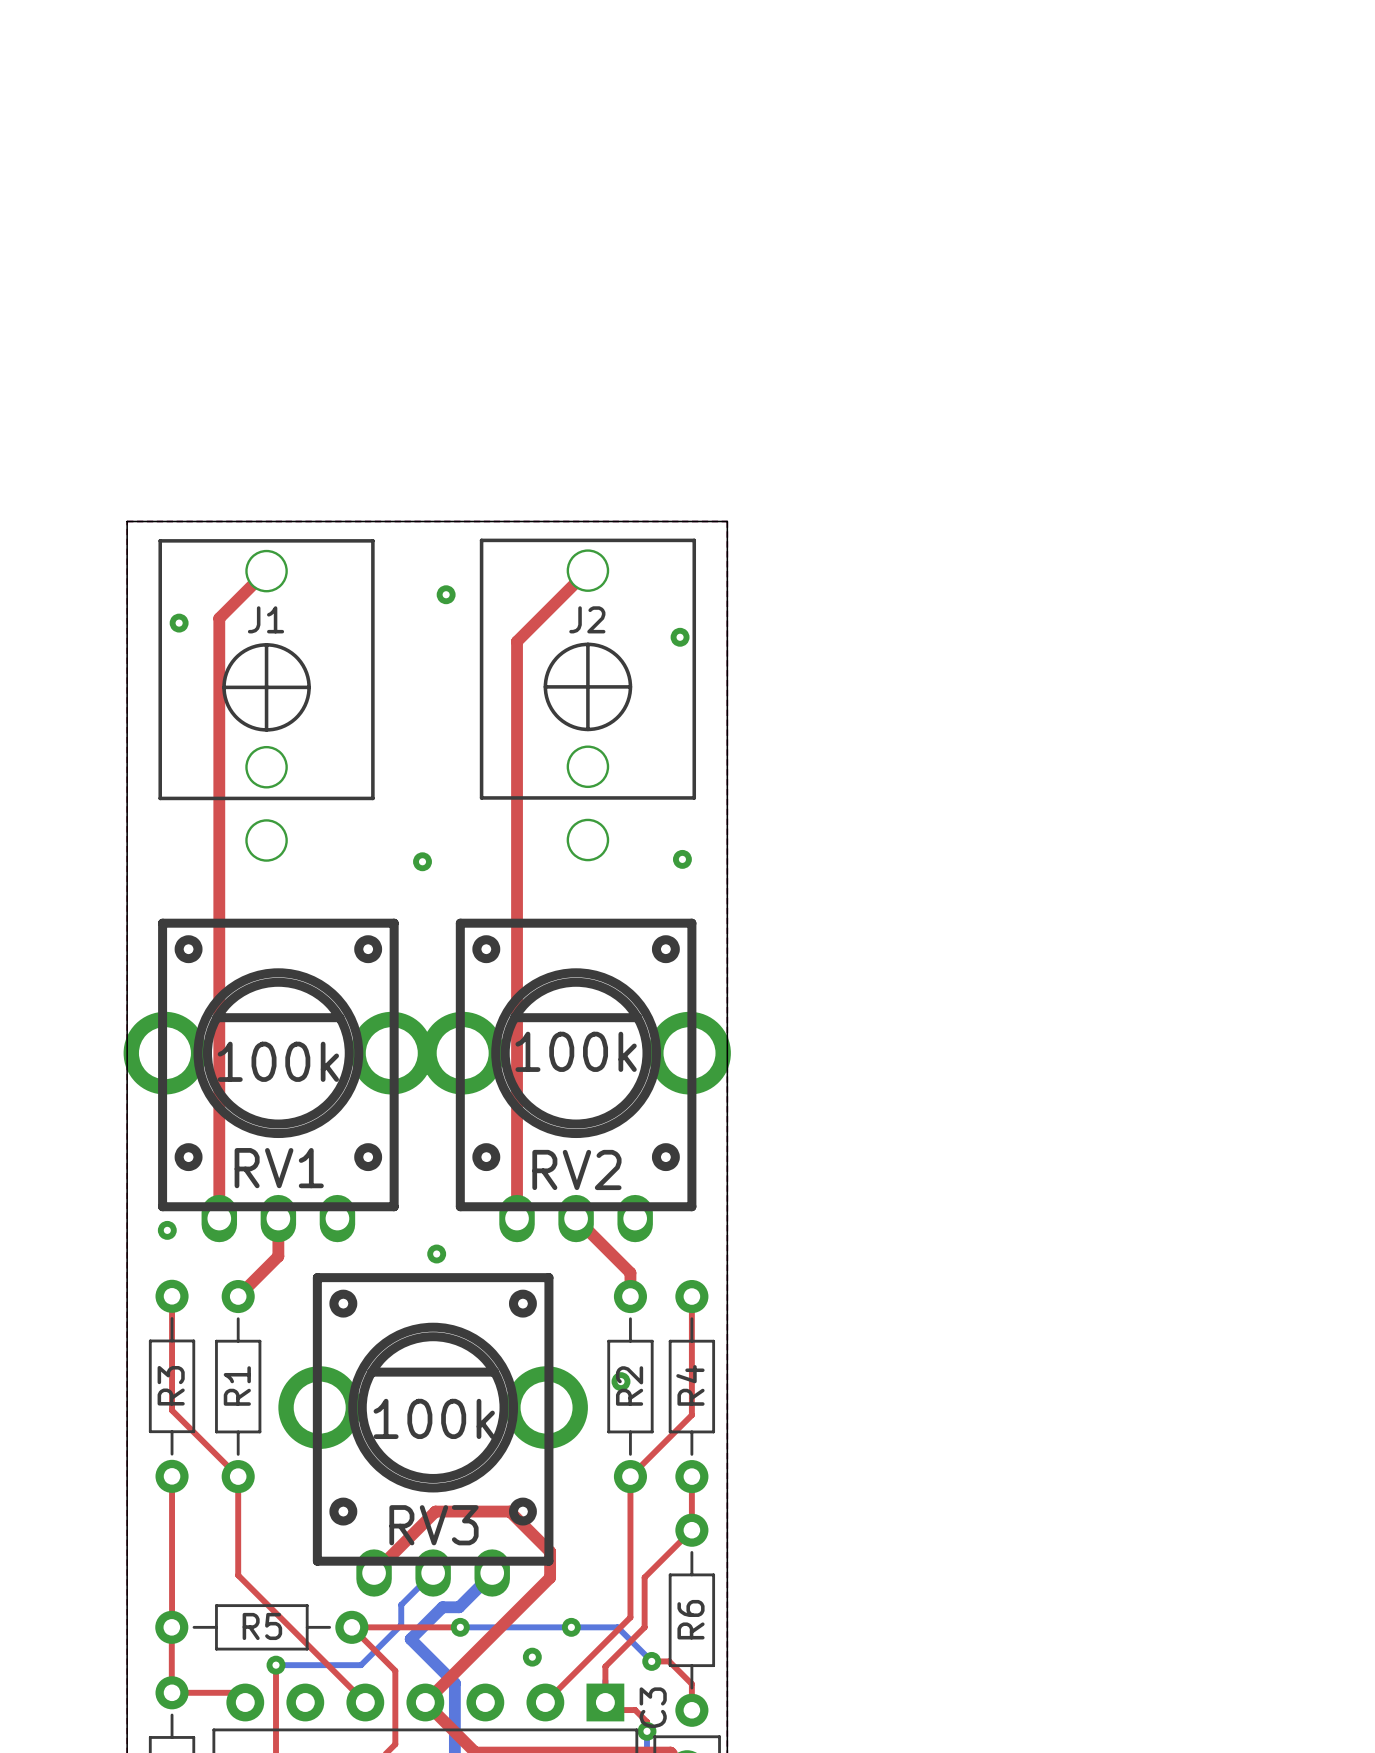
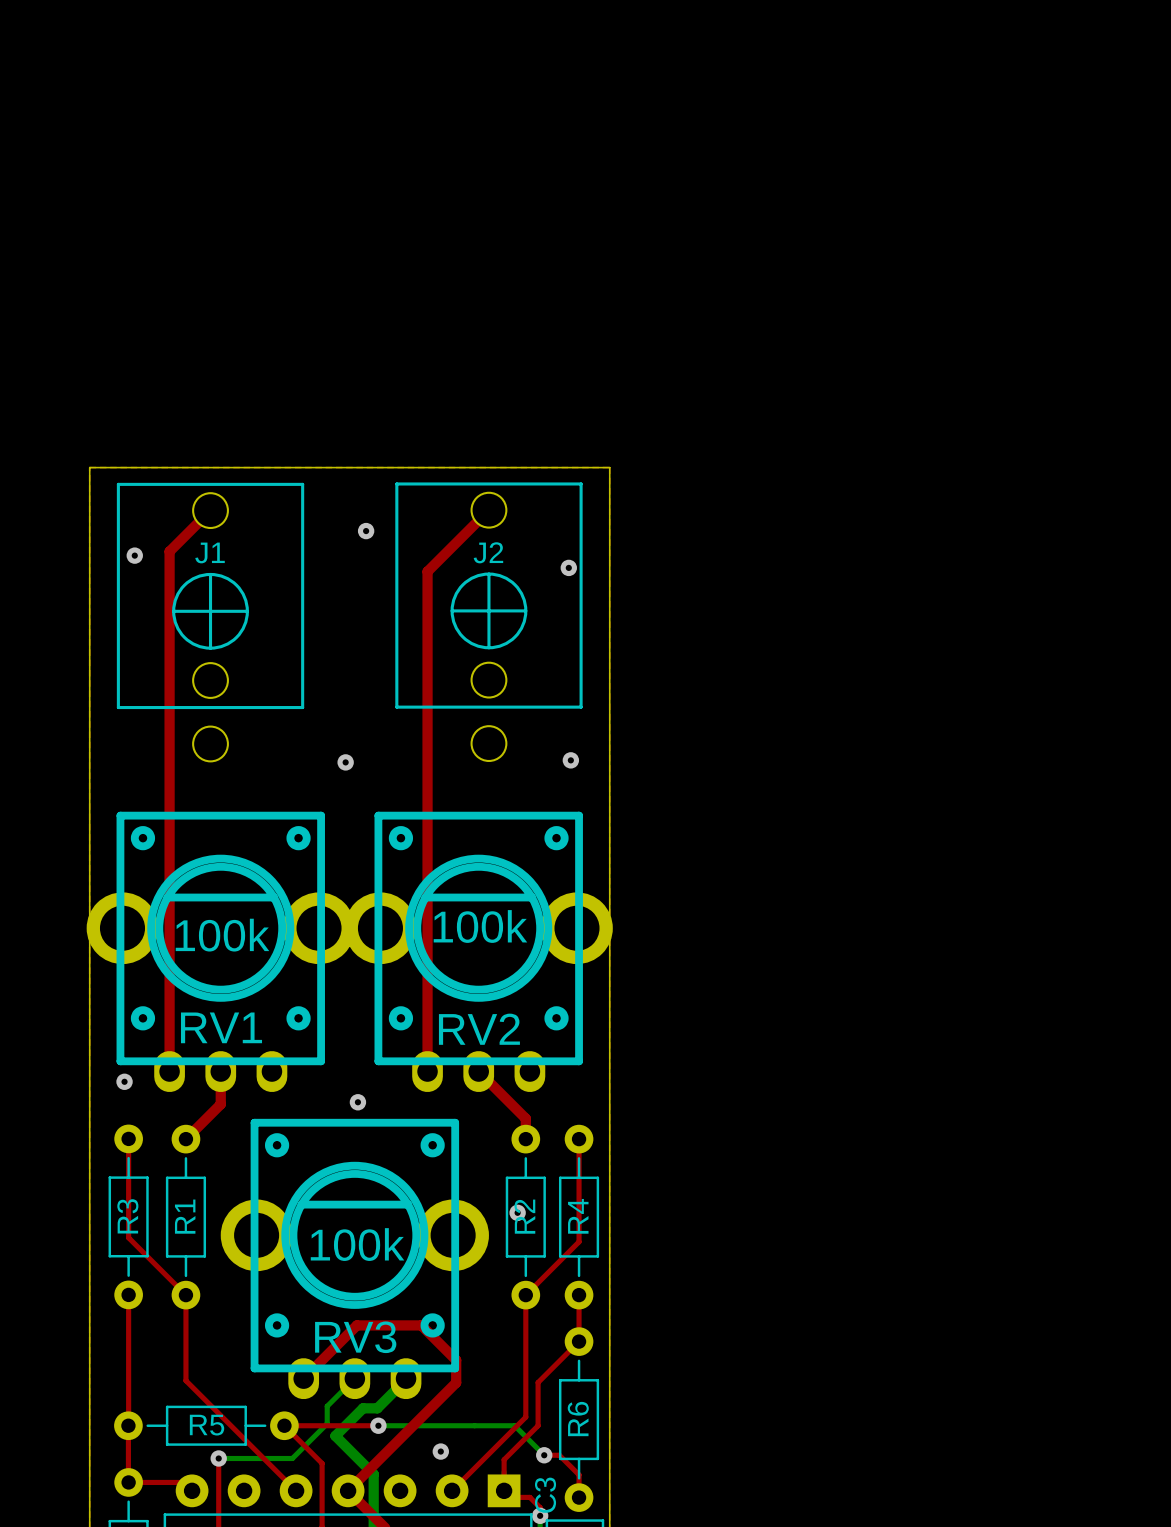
via: (571, 1627) -> none

